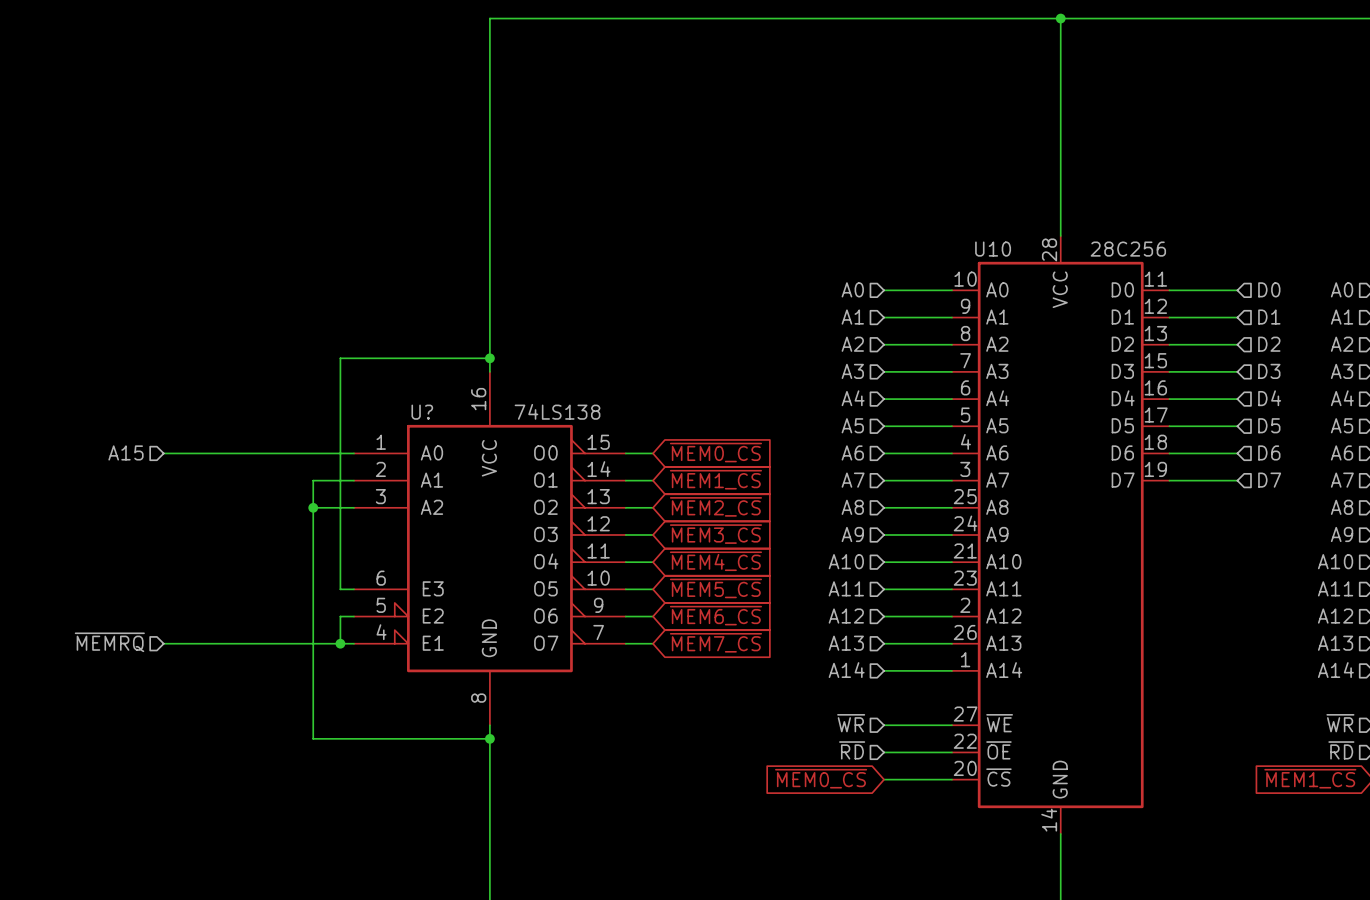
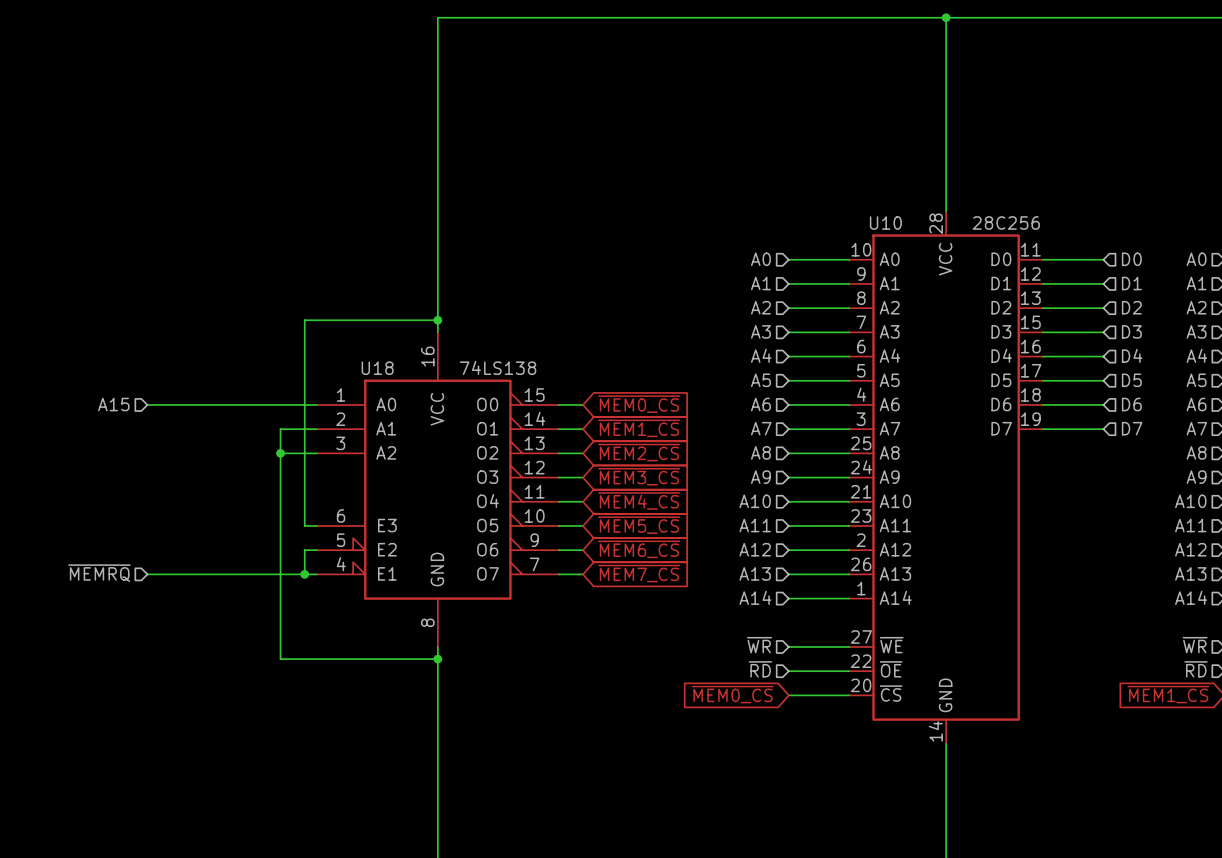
U? name: U? (422, 412) -> U18 (377, 368)

